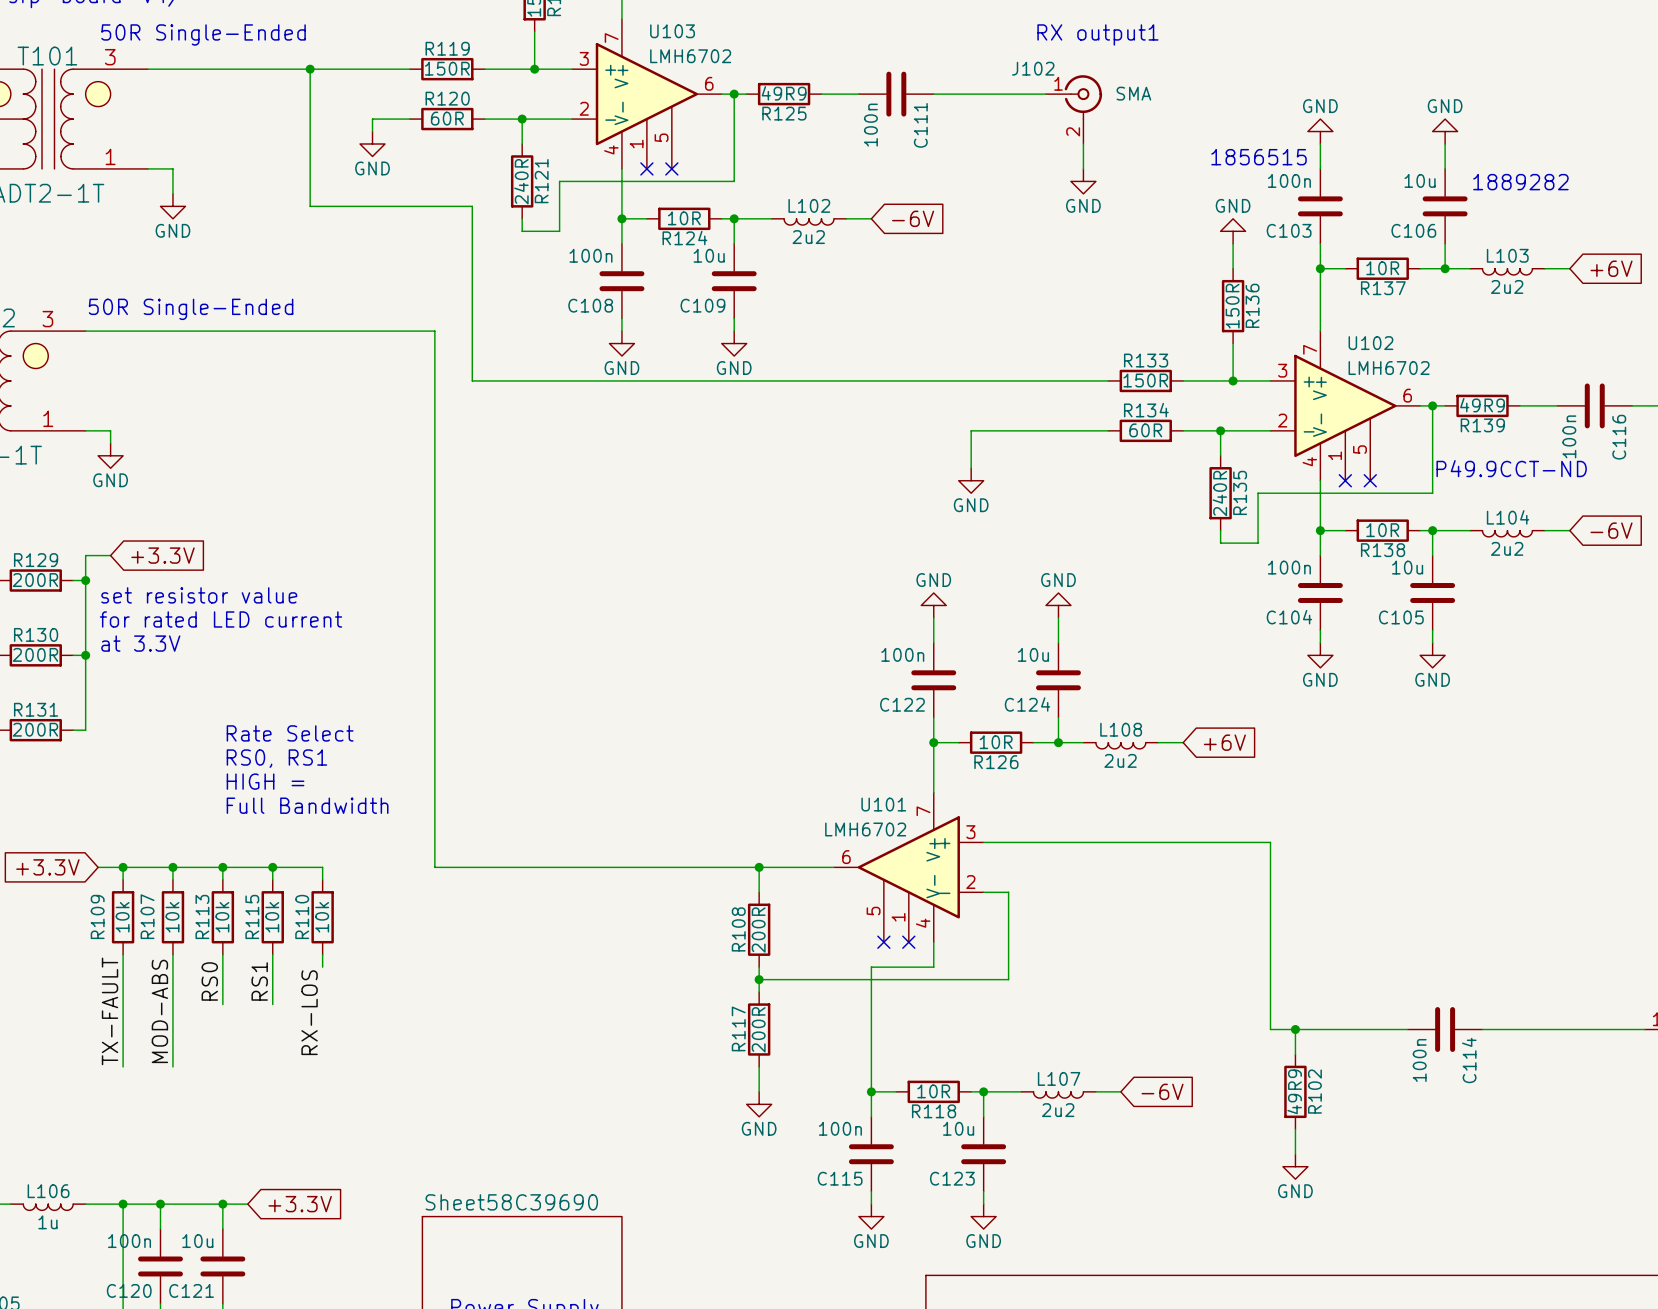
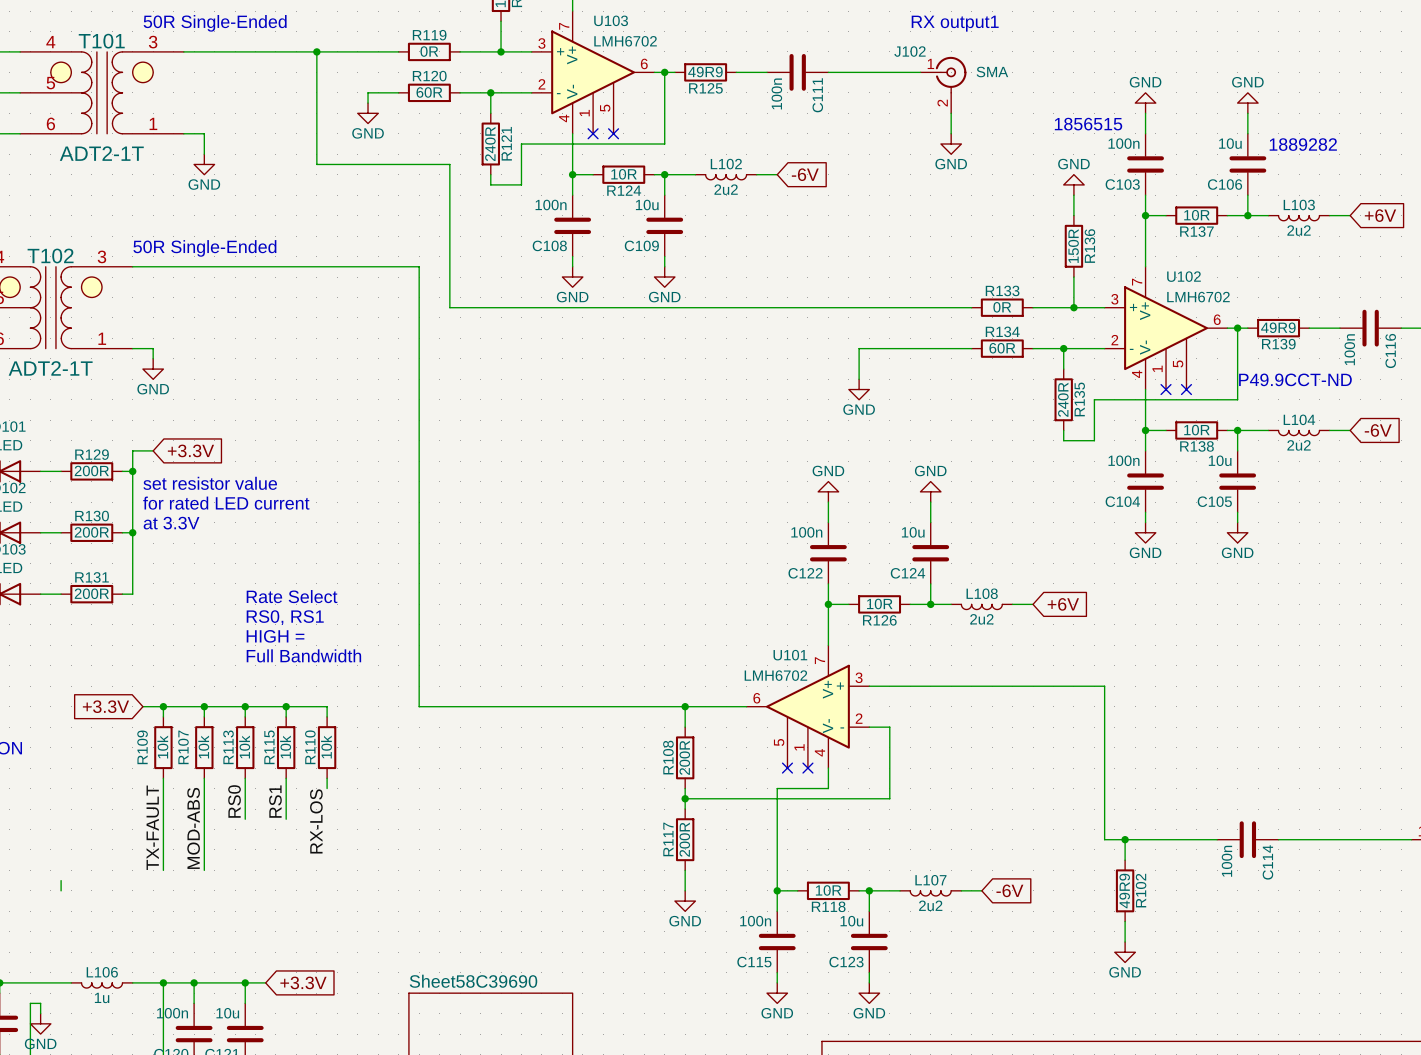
R119 value: 150R (447, 68) -> 0R (429, 51)
R133 value: 150R (1145, 380) -> 0R (1002, 307)

